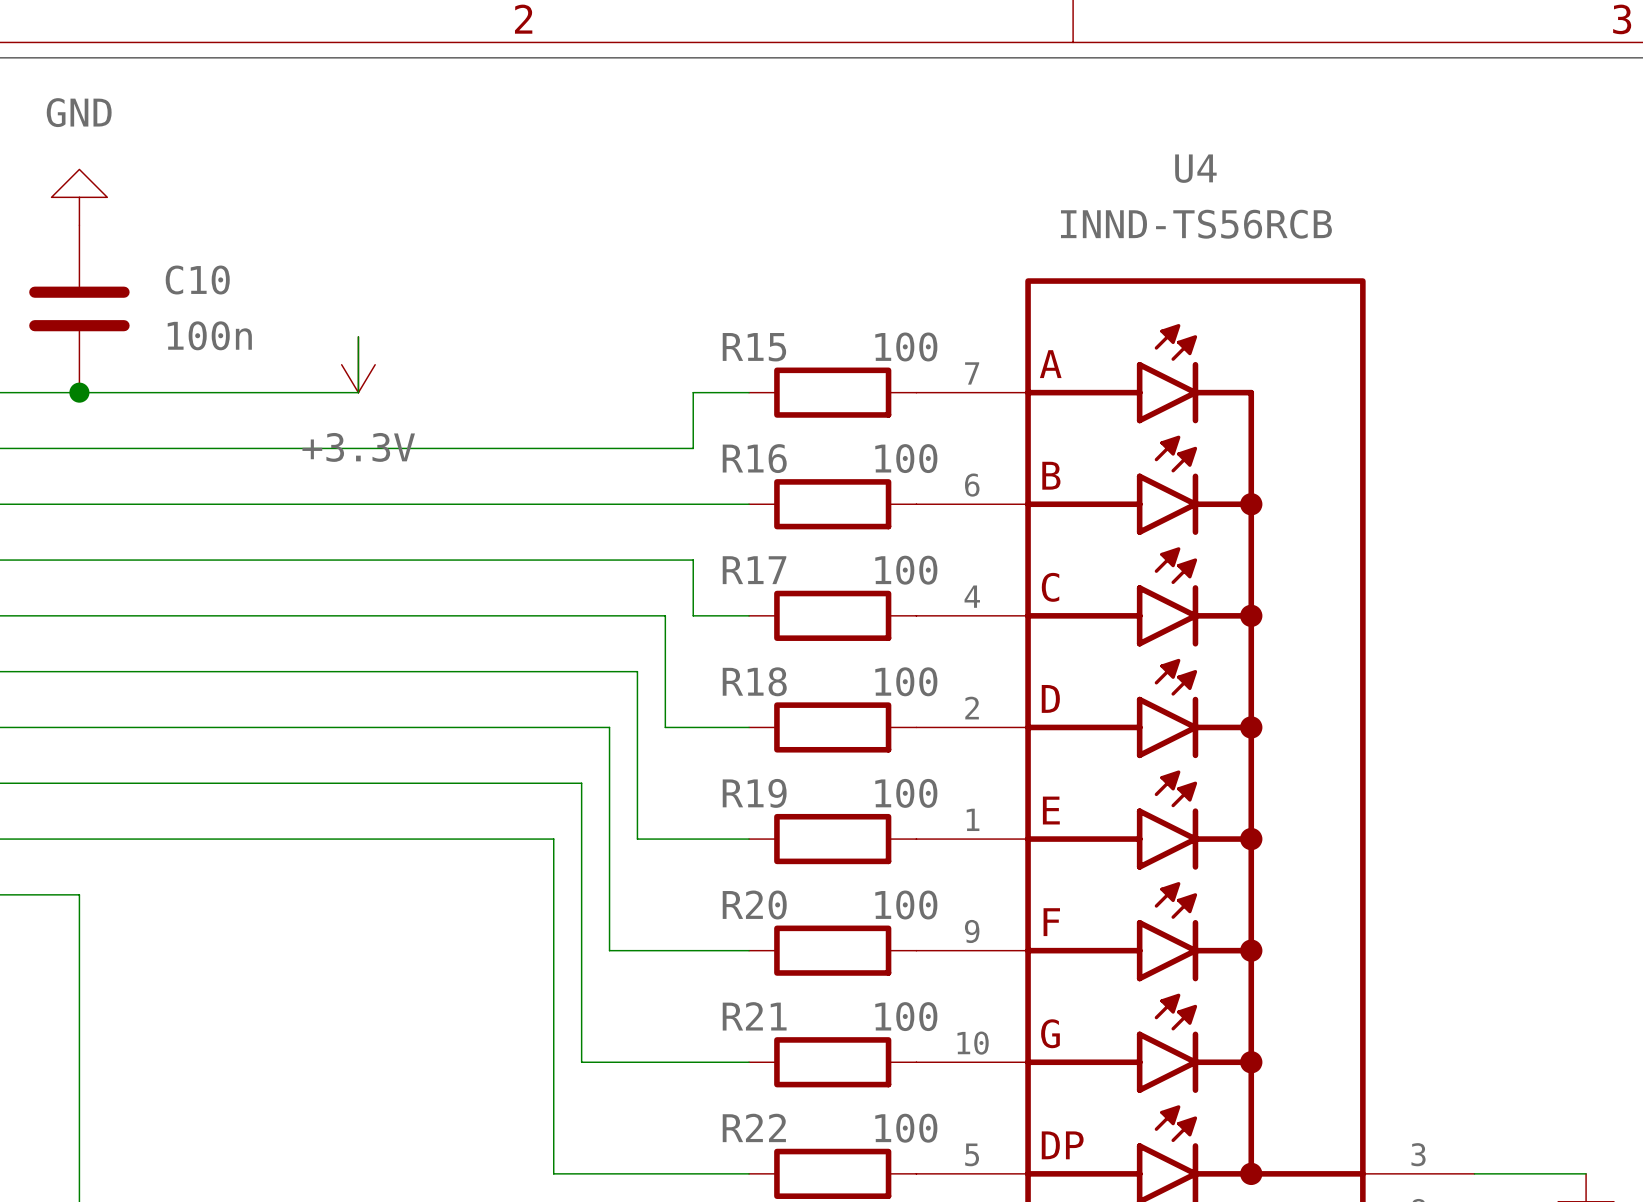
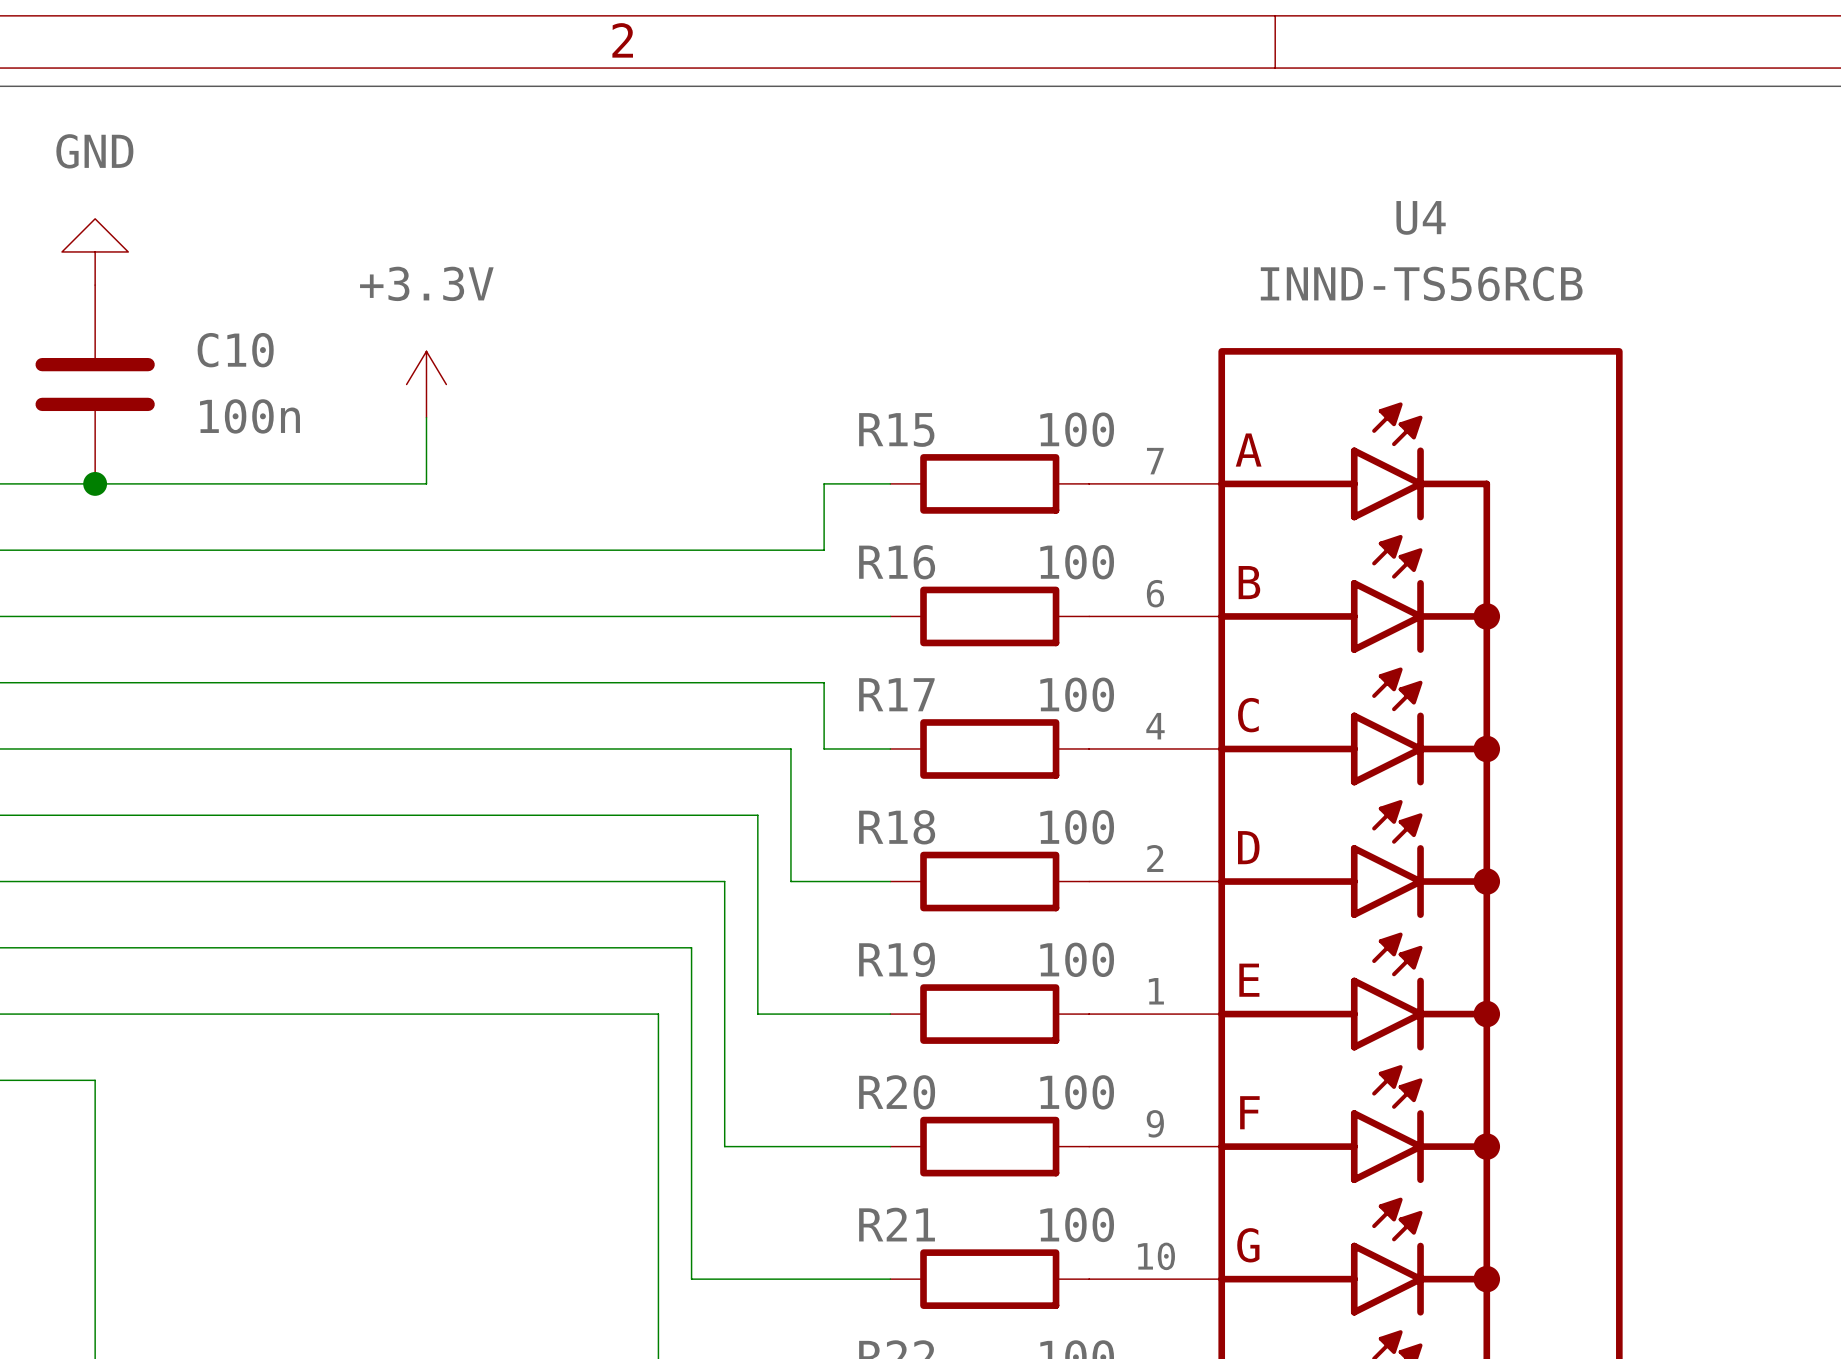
power symbol rotation: 0° (358, 364) -> 180° (426, 384)
power symbol position: +3.3V (358, 364) -> +3.3V (426, 384)

